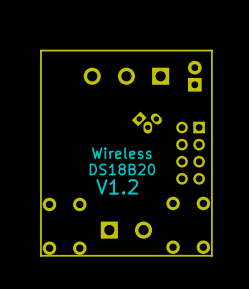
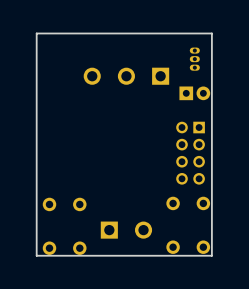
board edge: (211, 50) (40, 50) (40, 255) -> (211, 50) (211, 33) (36, 33) (36, 255) (40, 255)
part: none -> (194, 59)
part rotation: 0° (194, 76) -> 90° clockwise (194, 93)
part: (146, 122) -> none
text: Wireless (121, 153) -> none
text: DS18B20 (122, 169) -> none
text: V1.2 (117, 186) -> none

